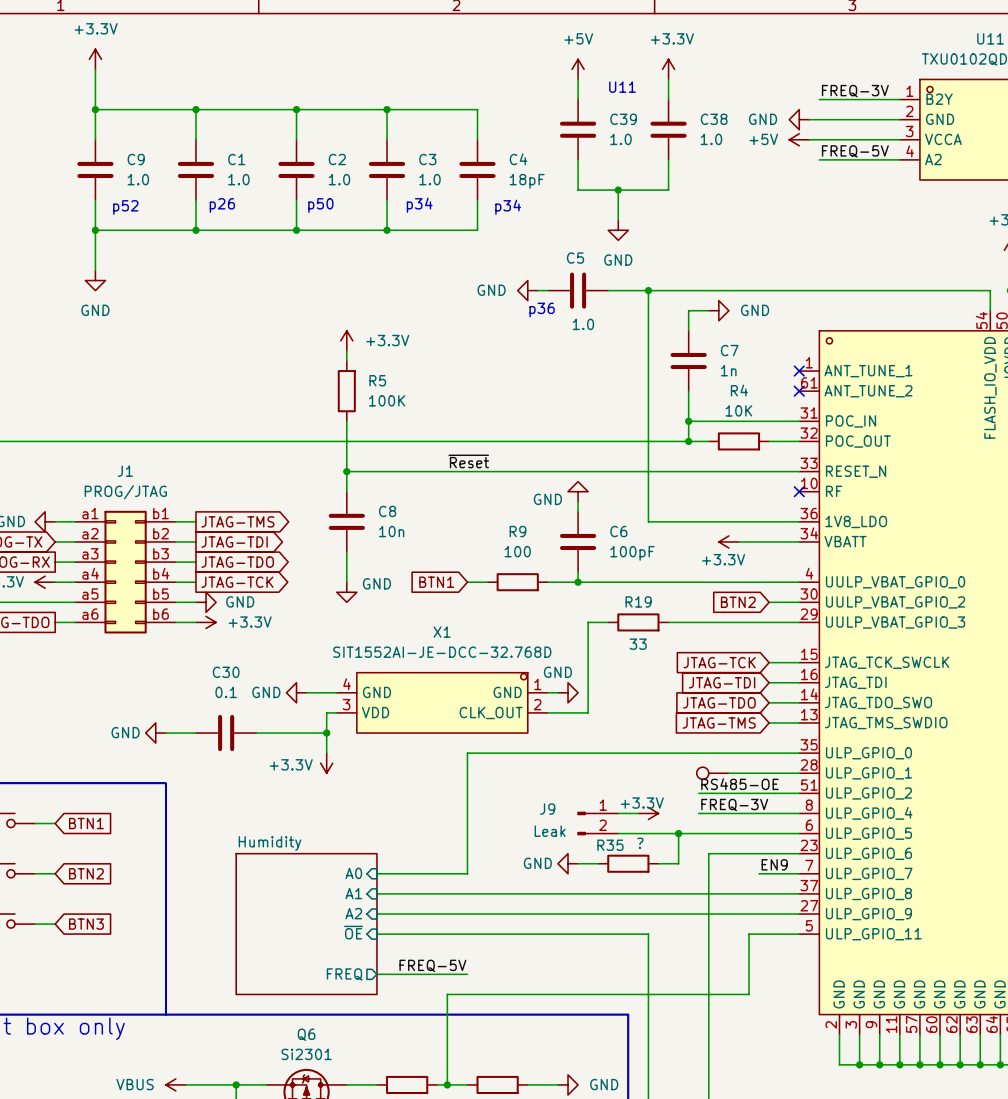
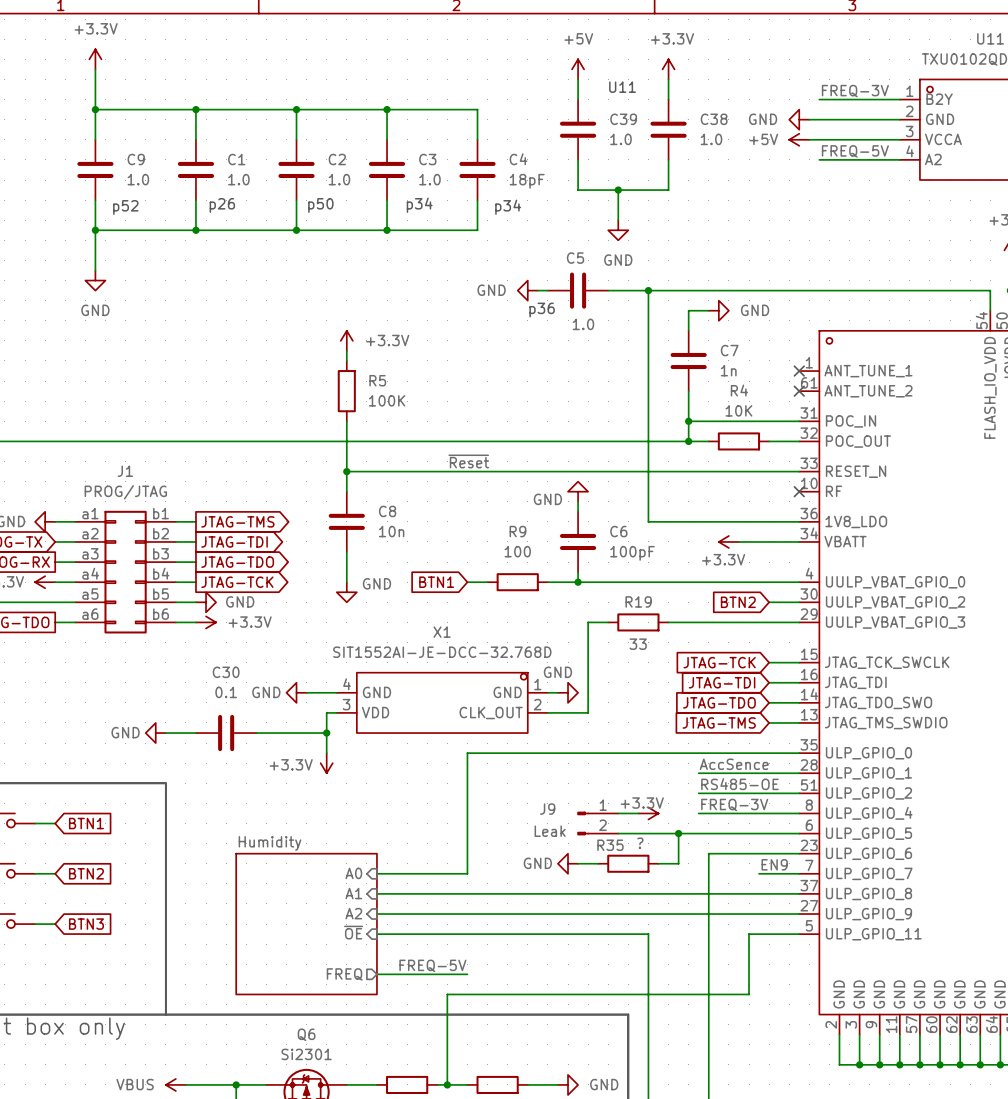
label: none -> AccSence (734, 764)
part: (712, 773) -> none

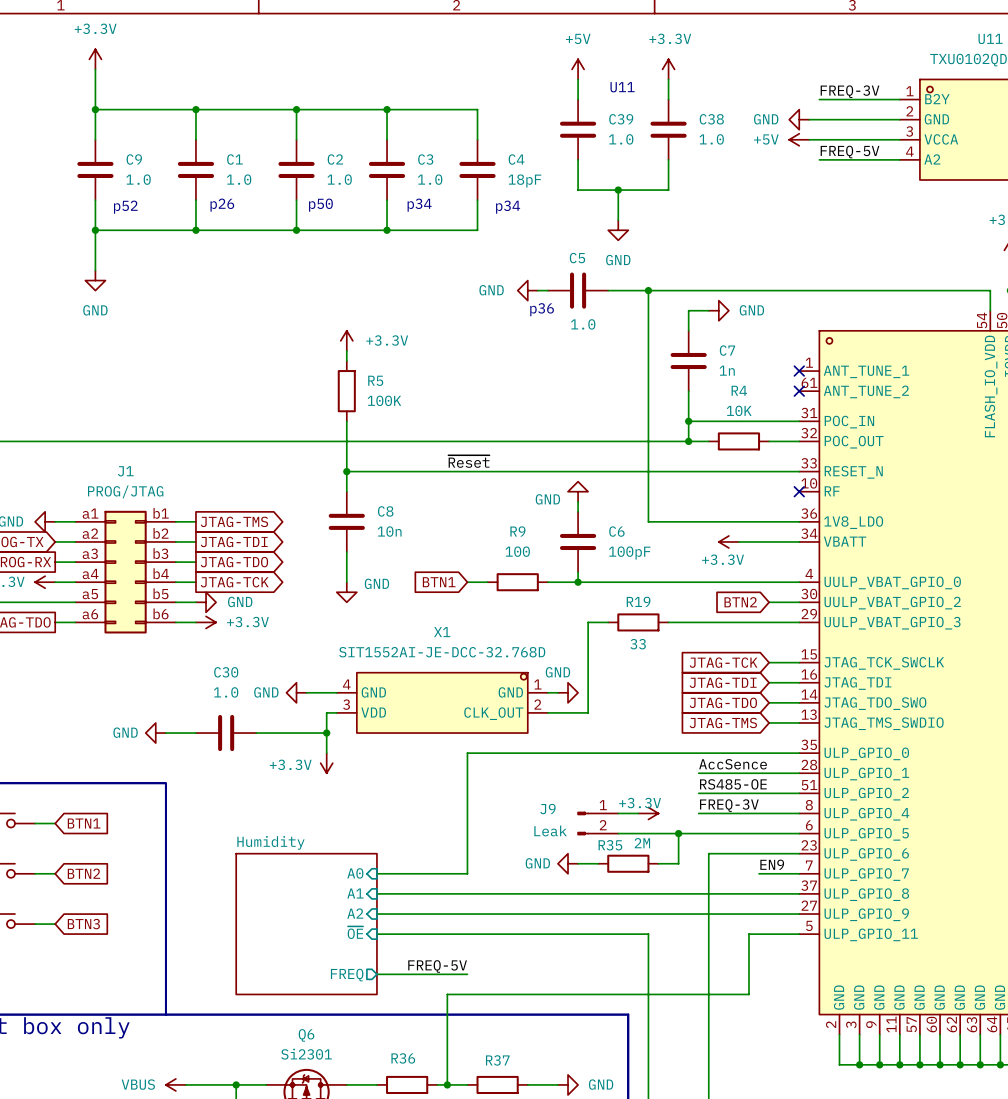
C30 value: 0.1 (226, 692) -> 1.0 (226, 692)
R35 value: ? (640, 843) -> 2M (642, 843)
R36 name: none -> R36 (403, 1058)
R37 name: none -> R37 (497, 1060)

